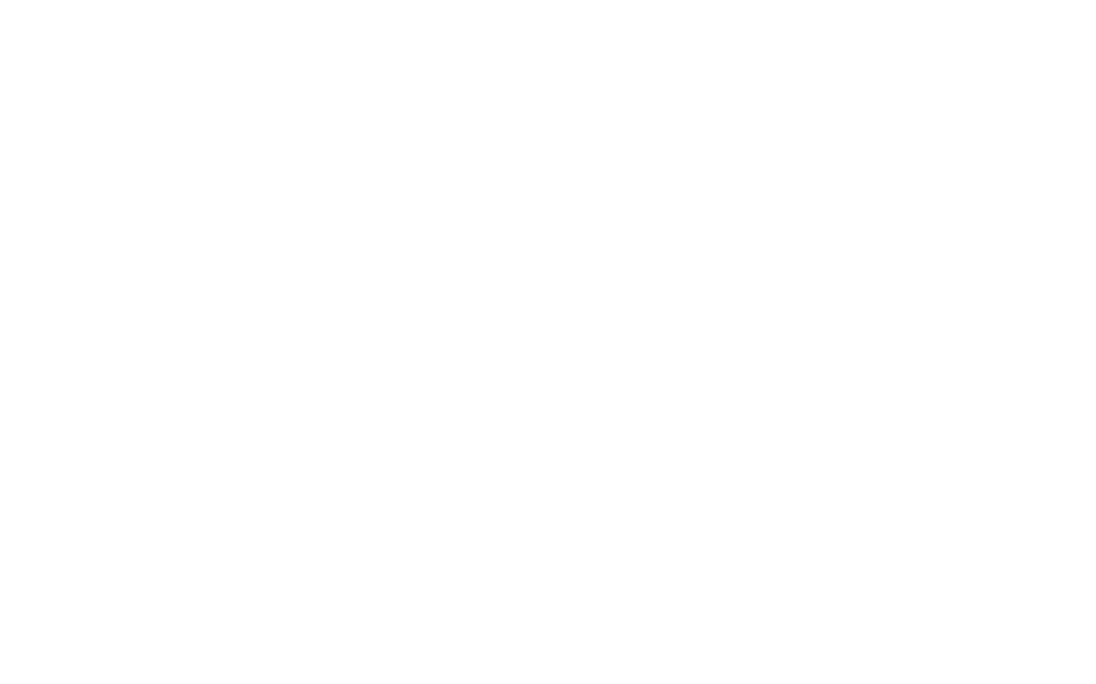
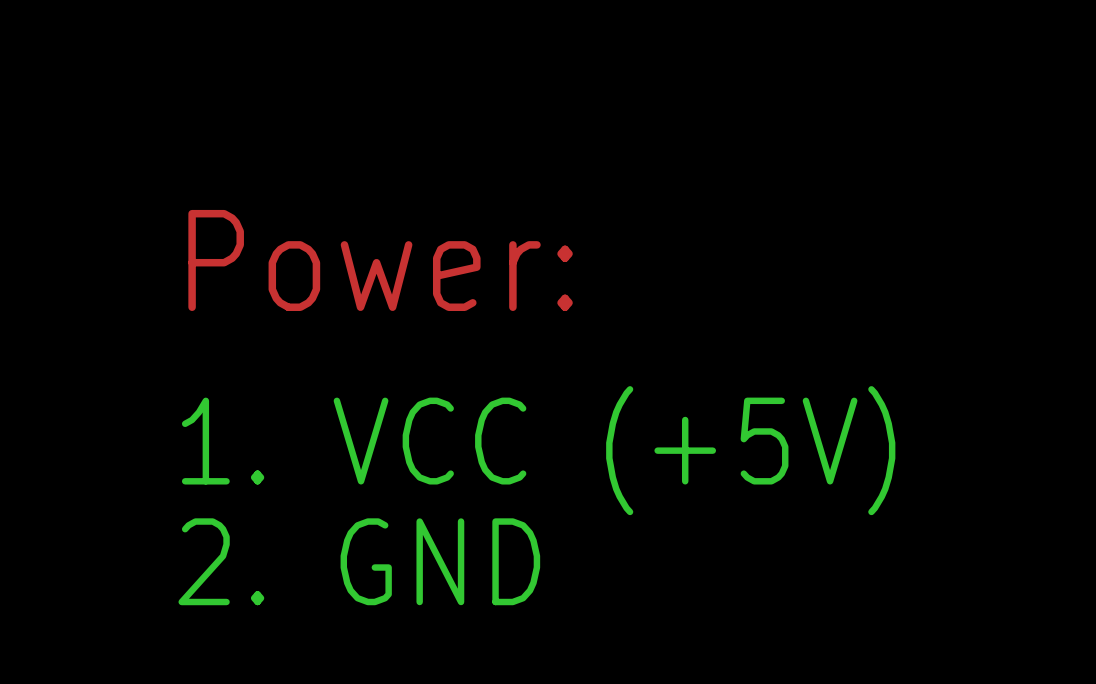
text: none -> Power: (380, 260)
text: none -> 1. VCC (+5V) (538, 450)
text: none -> 2. GND (359, 561)

